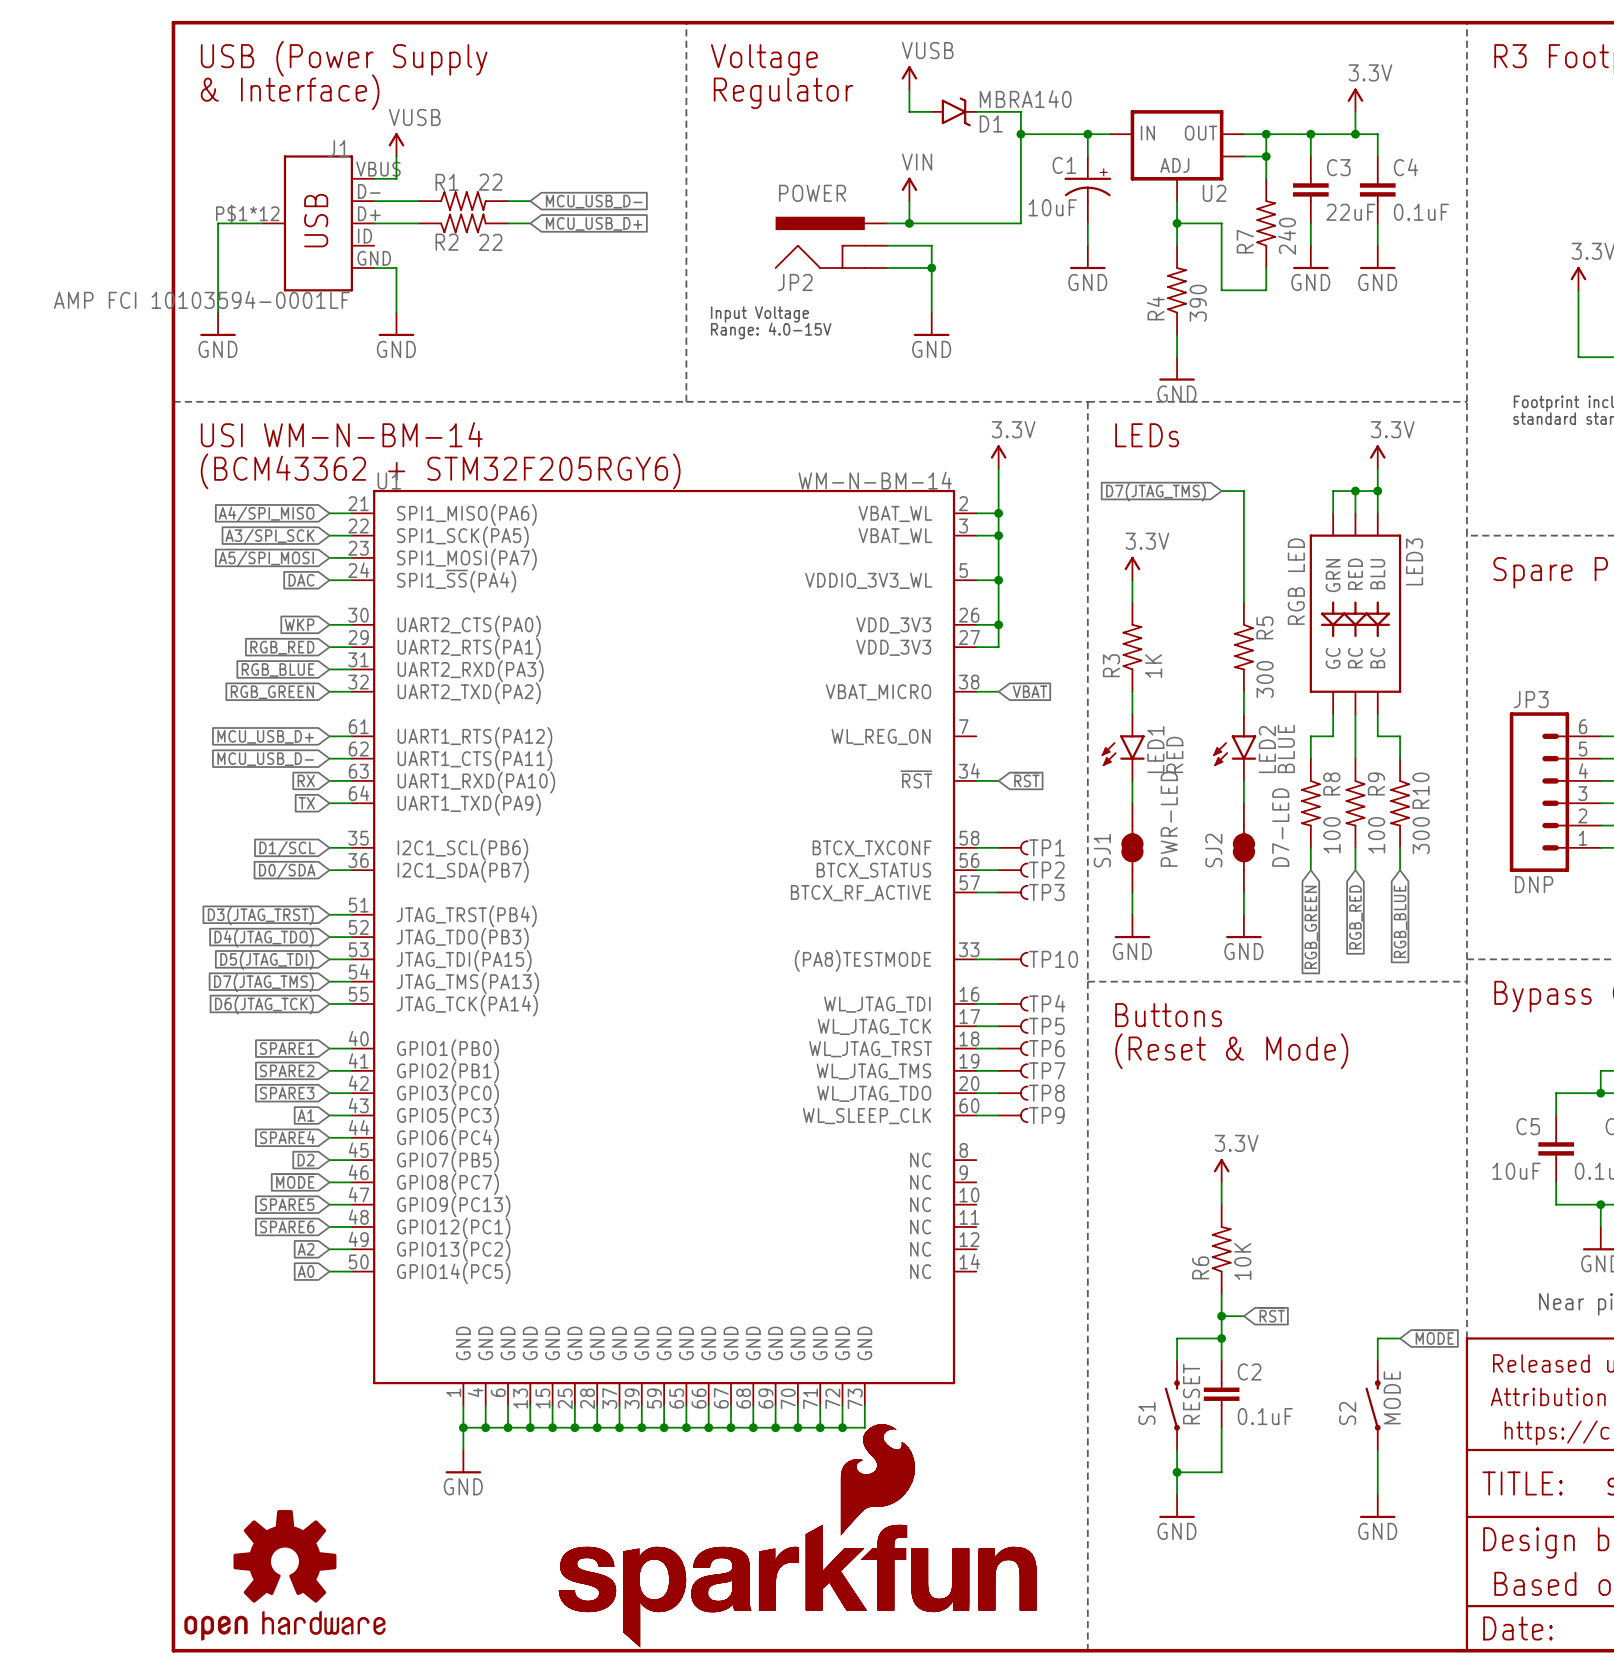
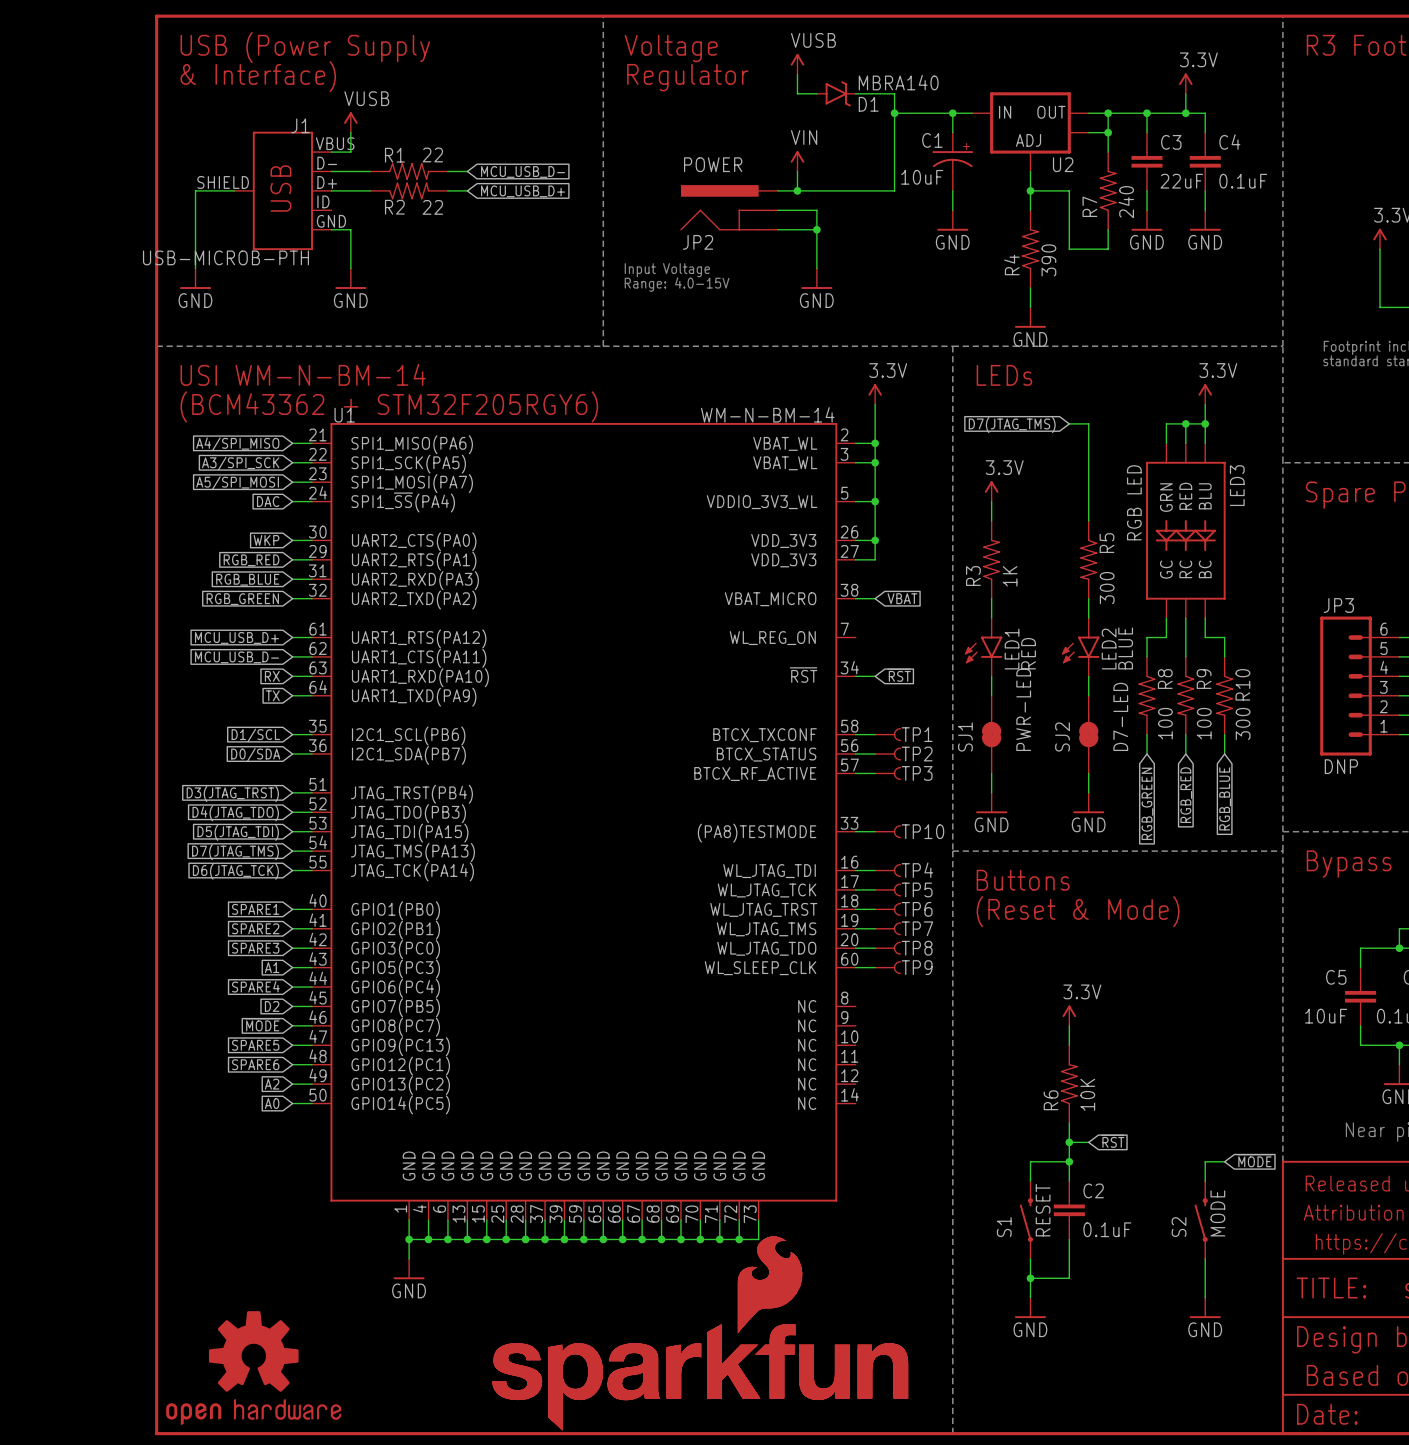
J1 pin number: P$1*12 (247, 213) -> SHIELD (223, 182)
J1 value: AMP FCI 10103594-0001LF (201, 299) -> USB-MICROB-PTH (225, 257)

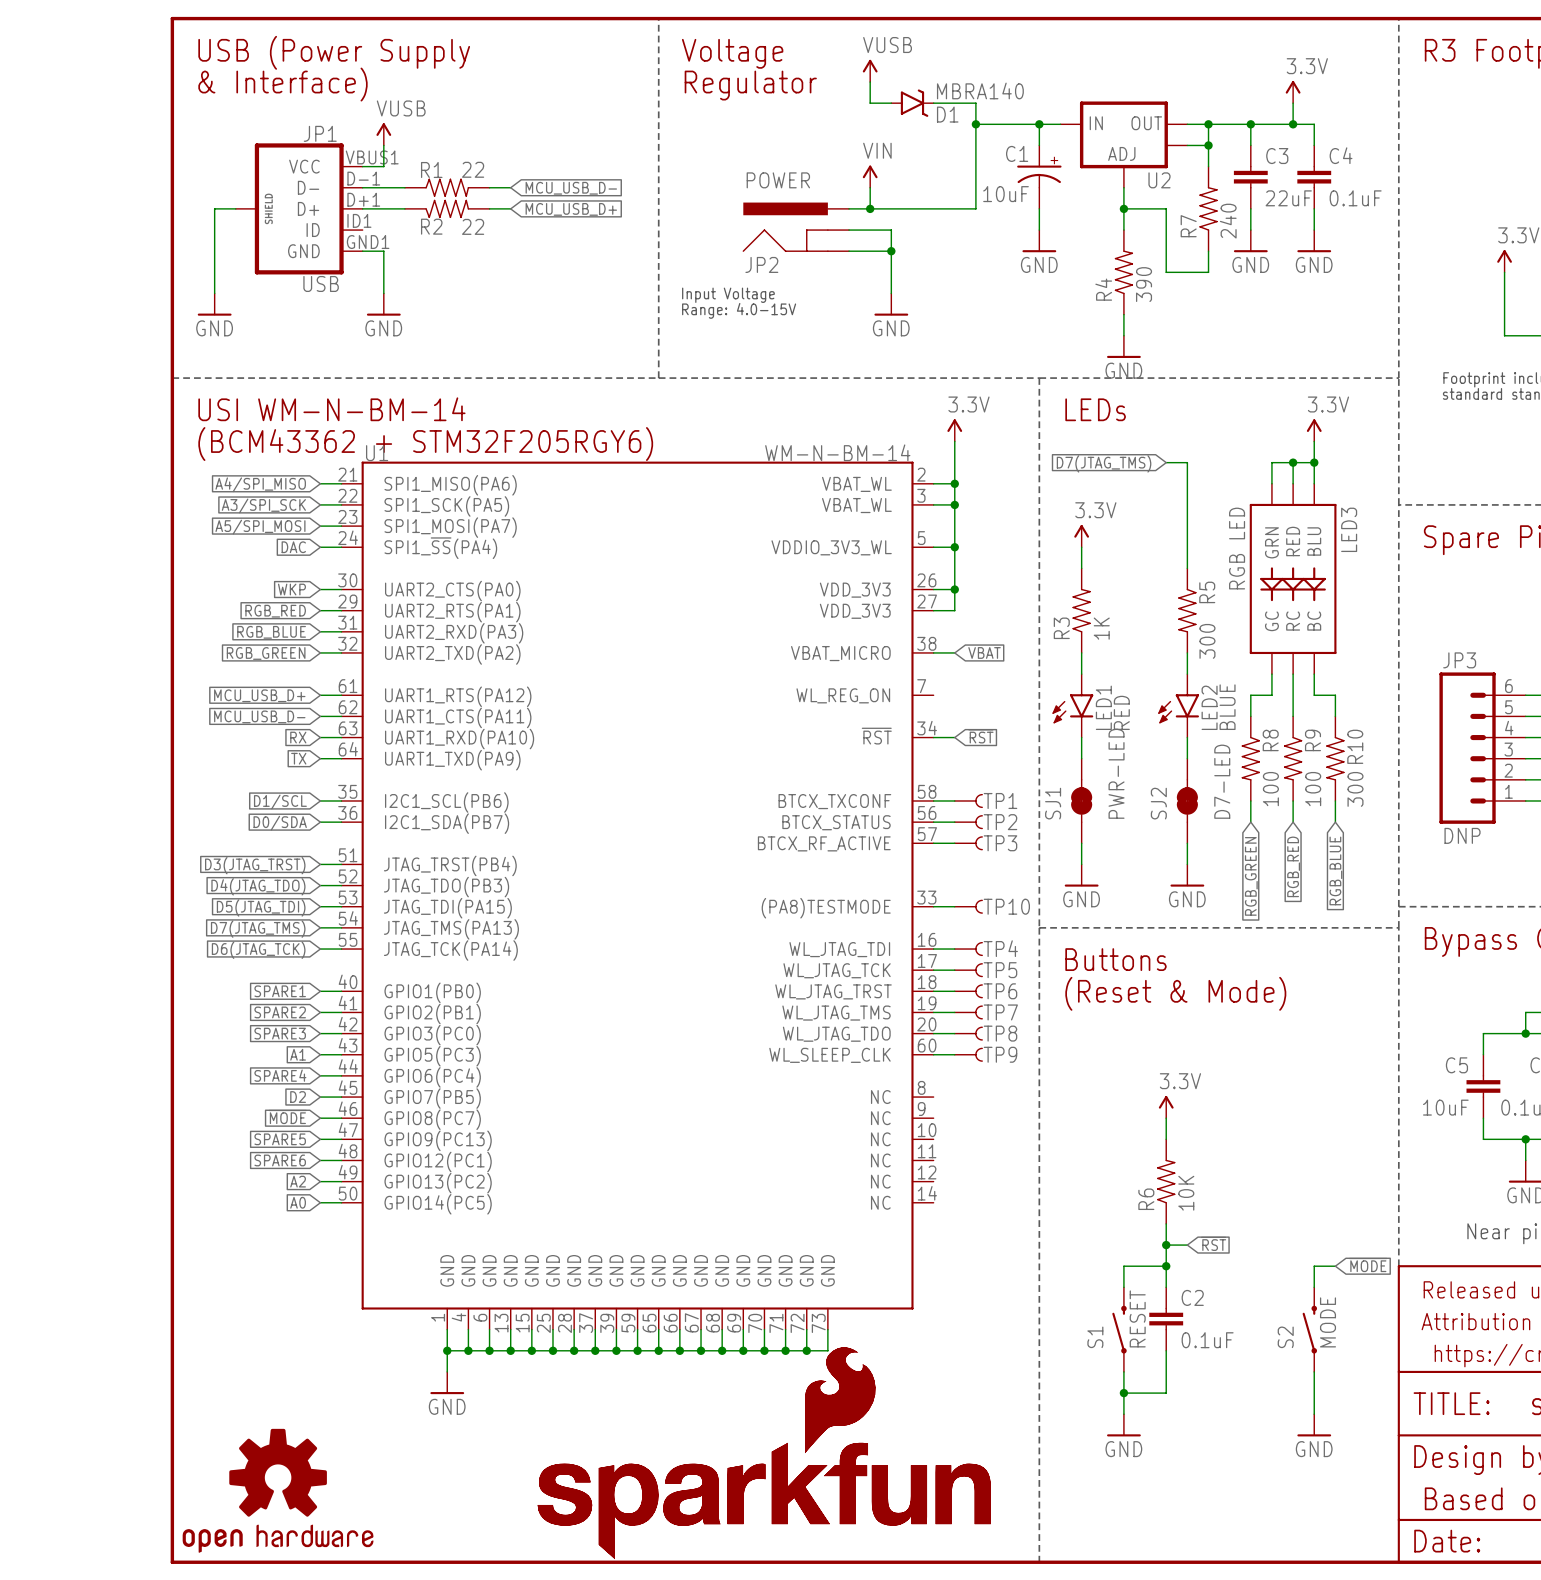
JP1: none -> USB (299, 208)
J1: USB-MICROB-PTH (282, 190) -> none

